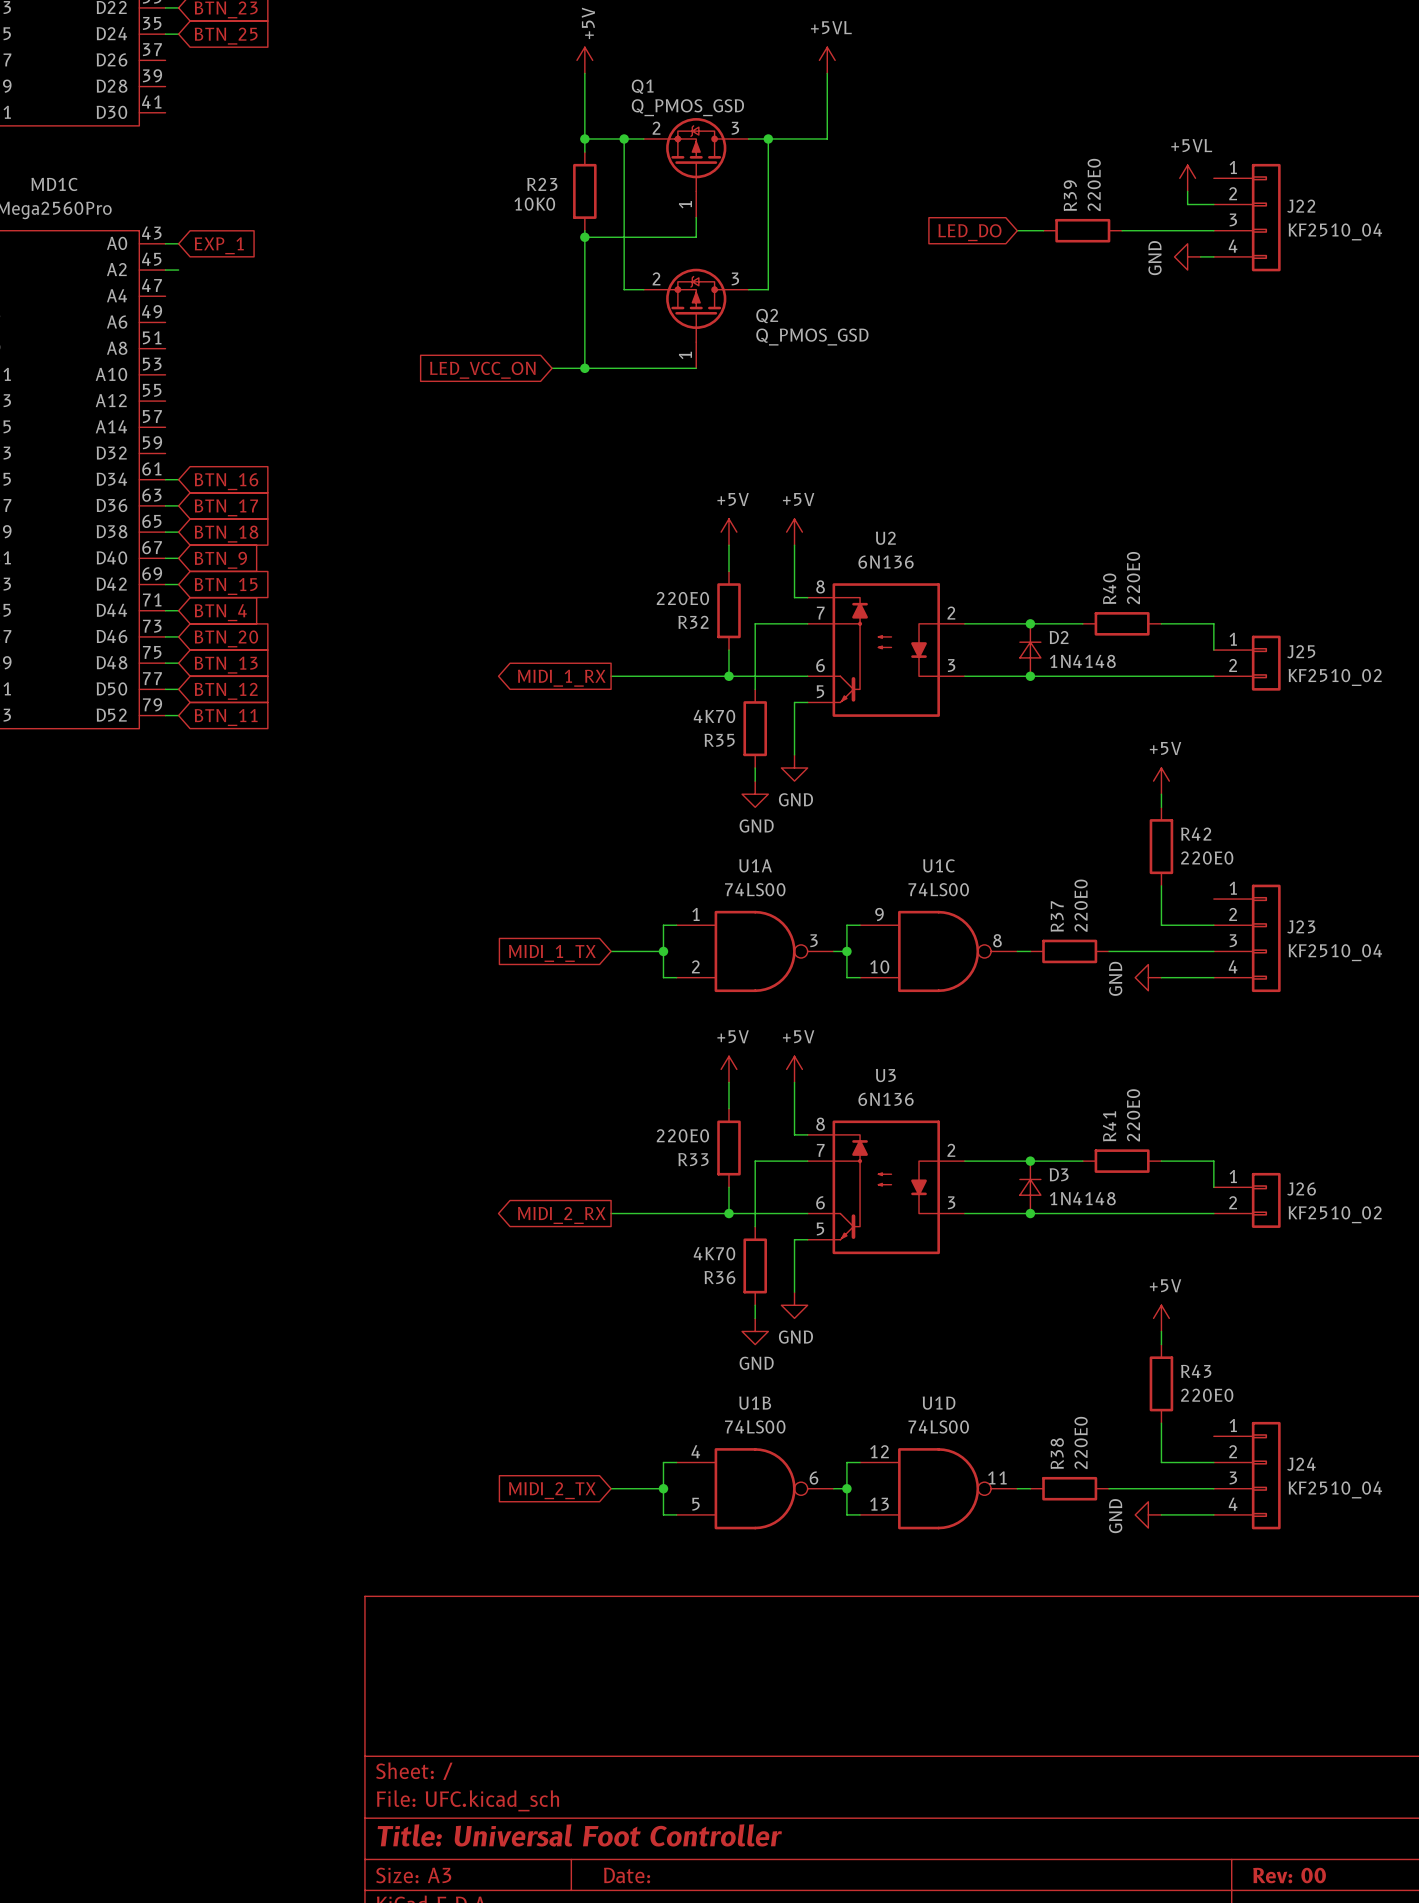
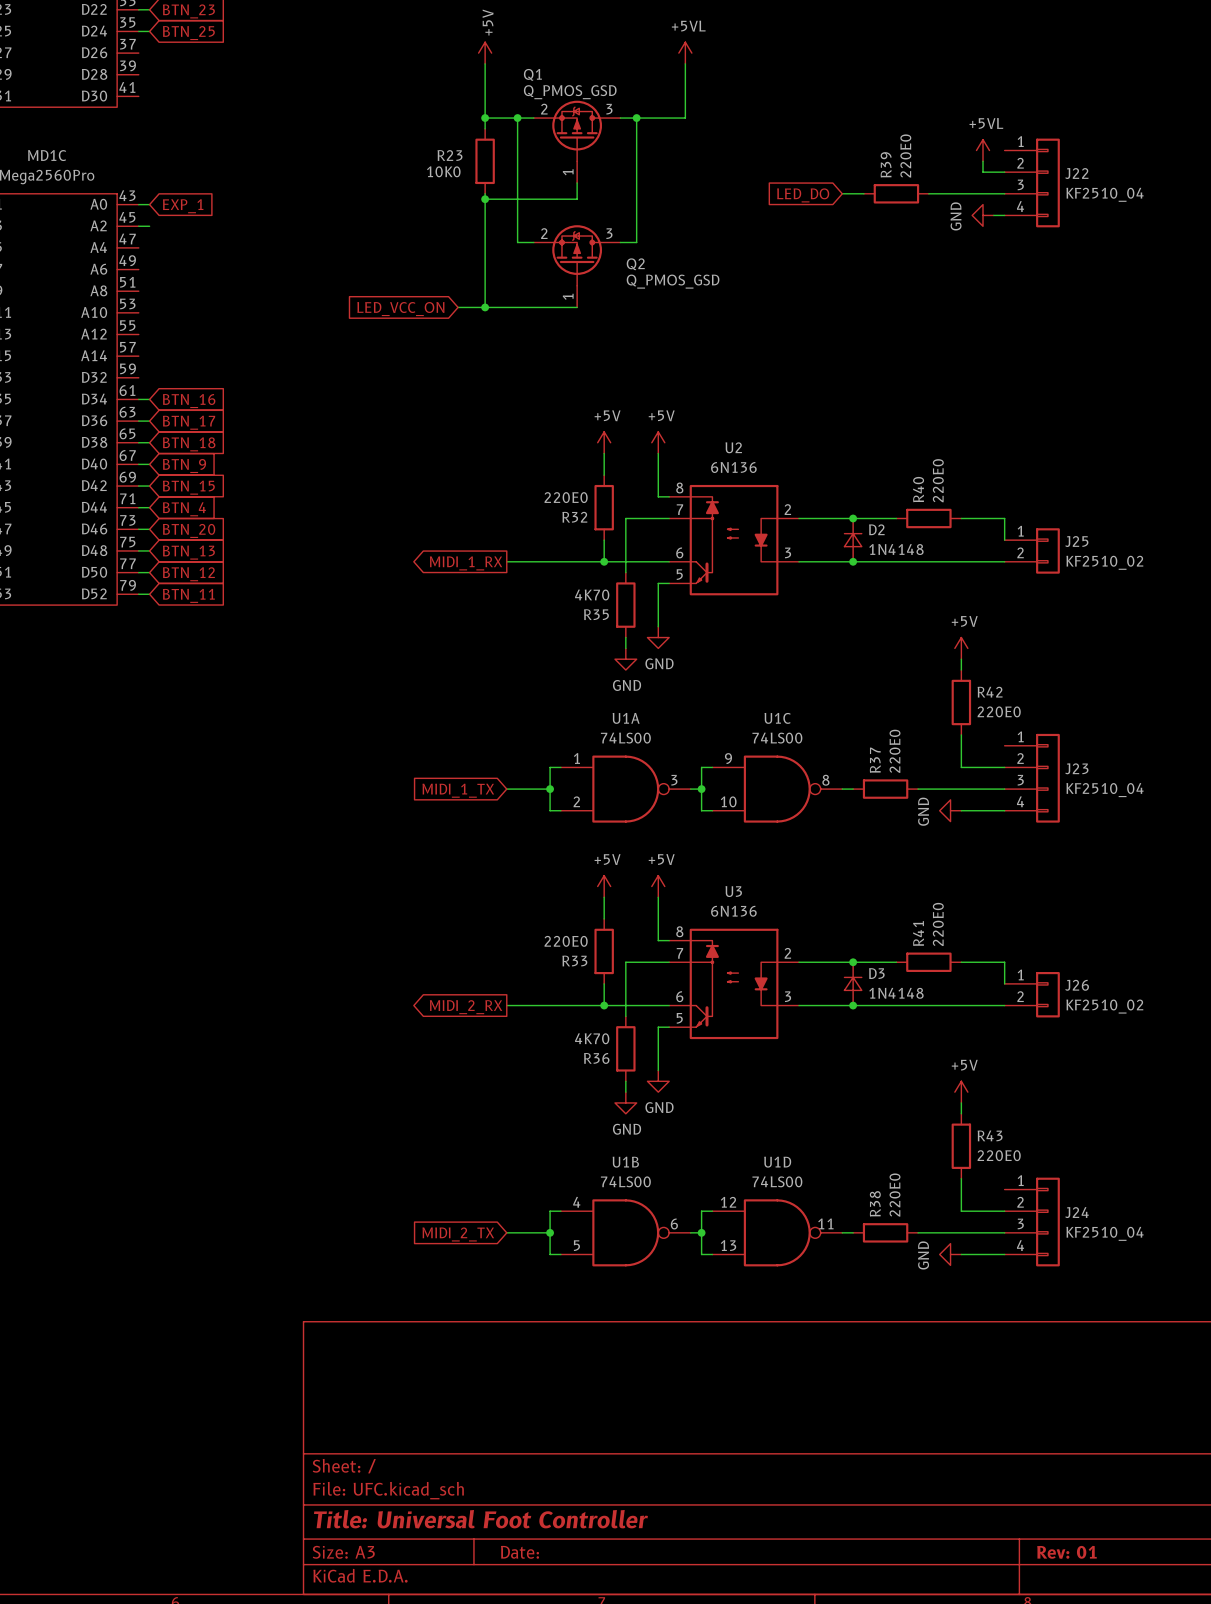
title block: Rev: 00 (1289, 1875) -> Rev: 01 (1066, 1552)

